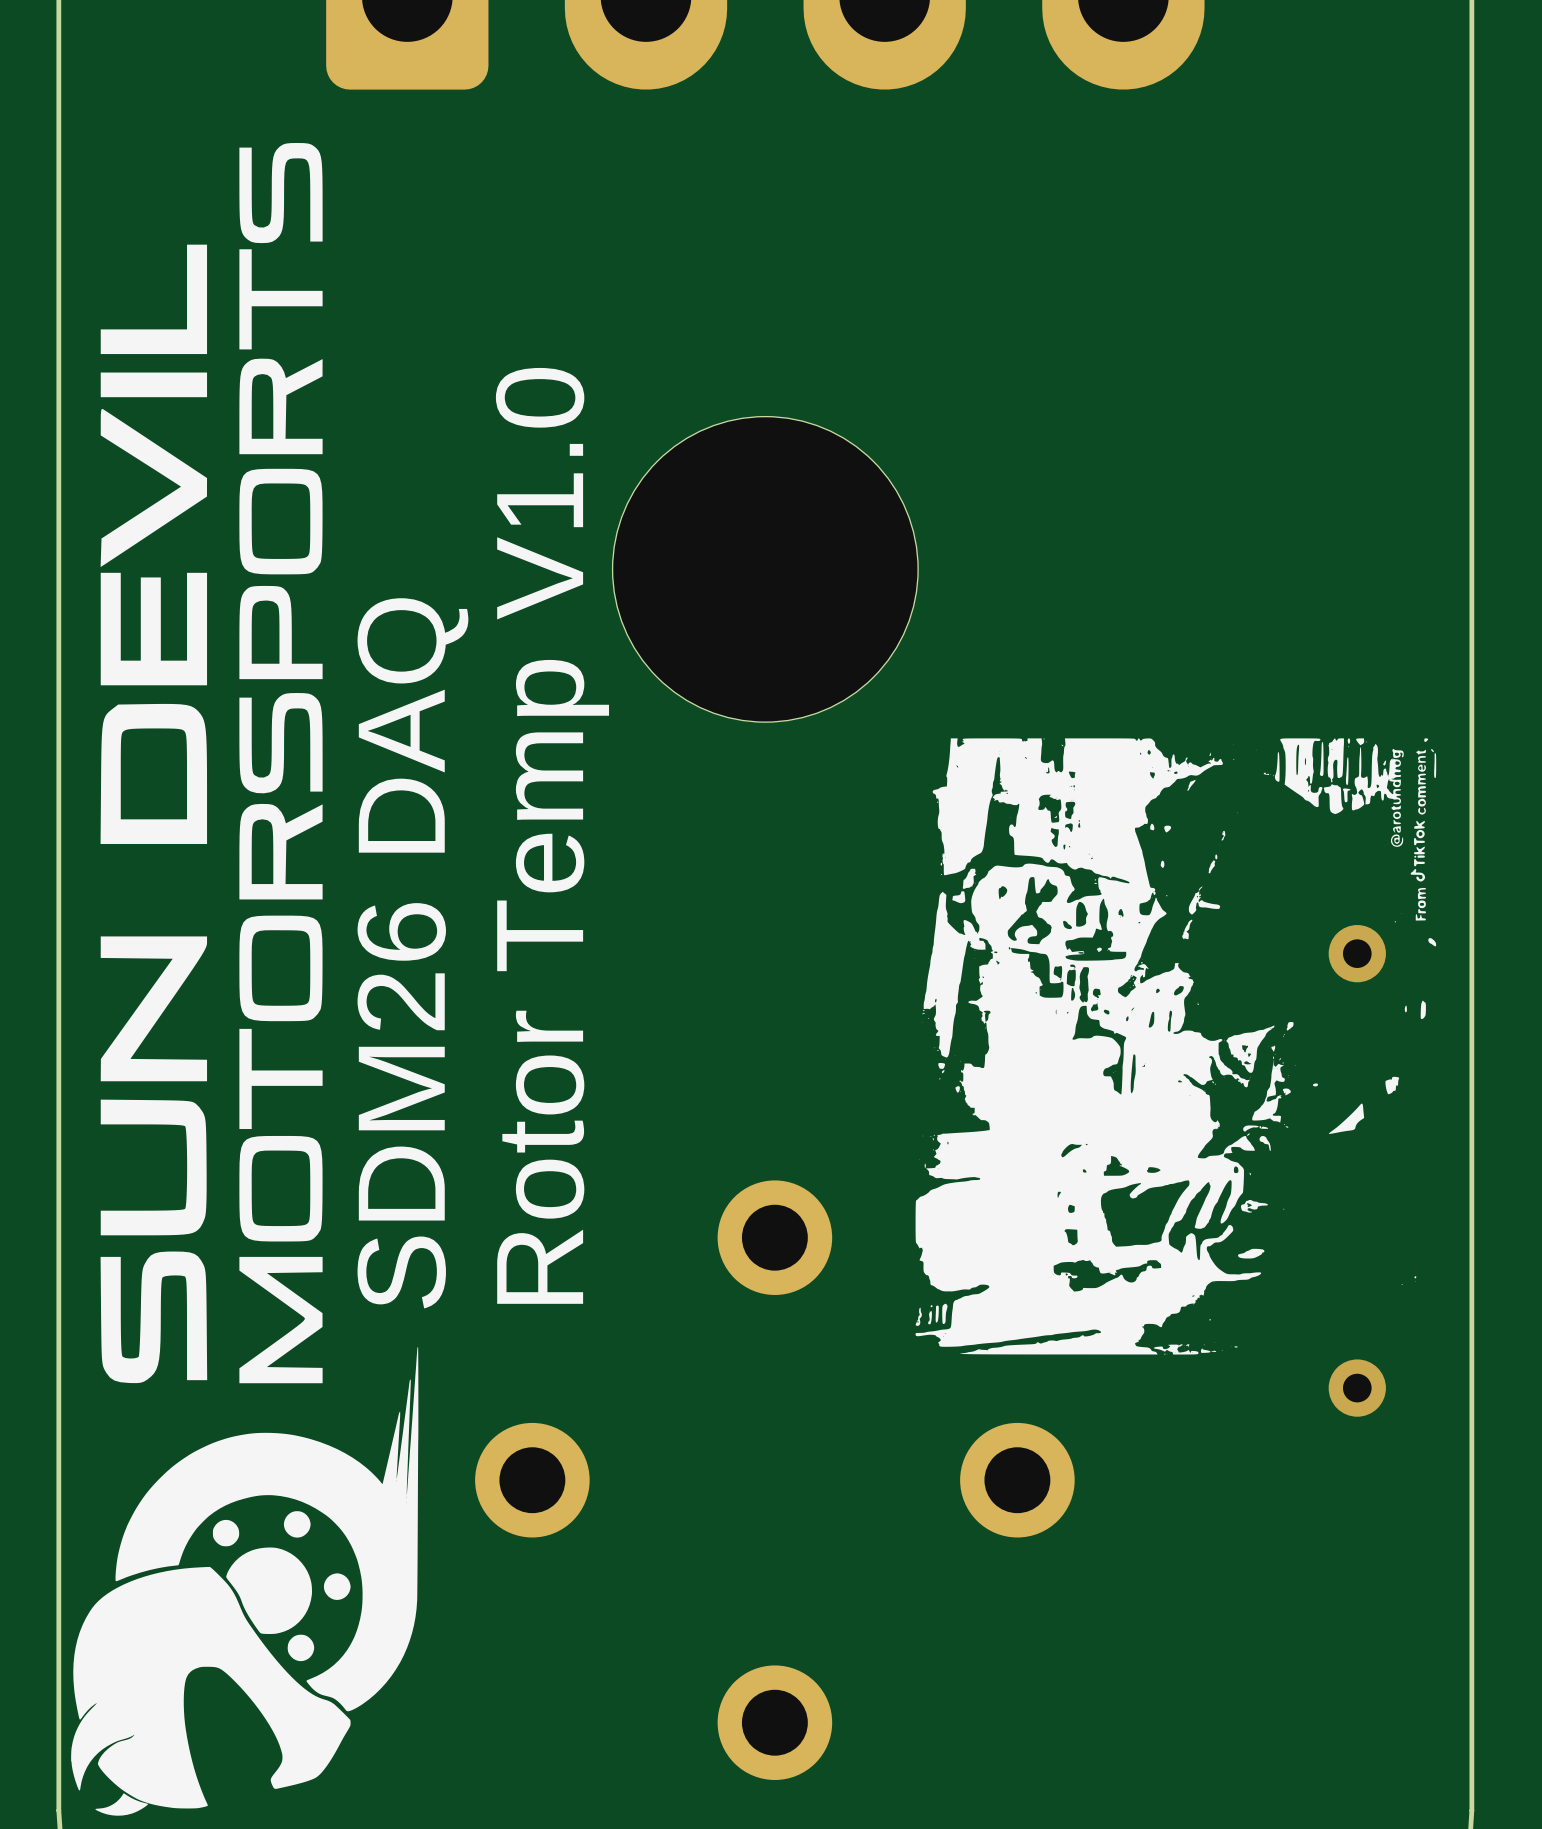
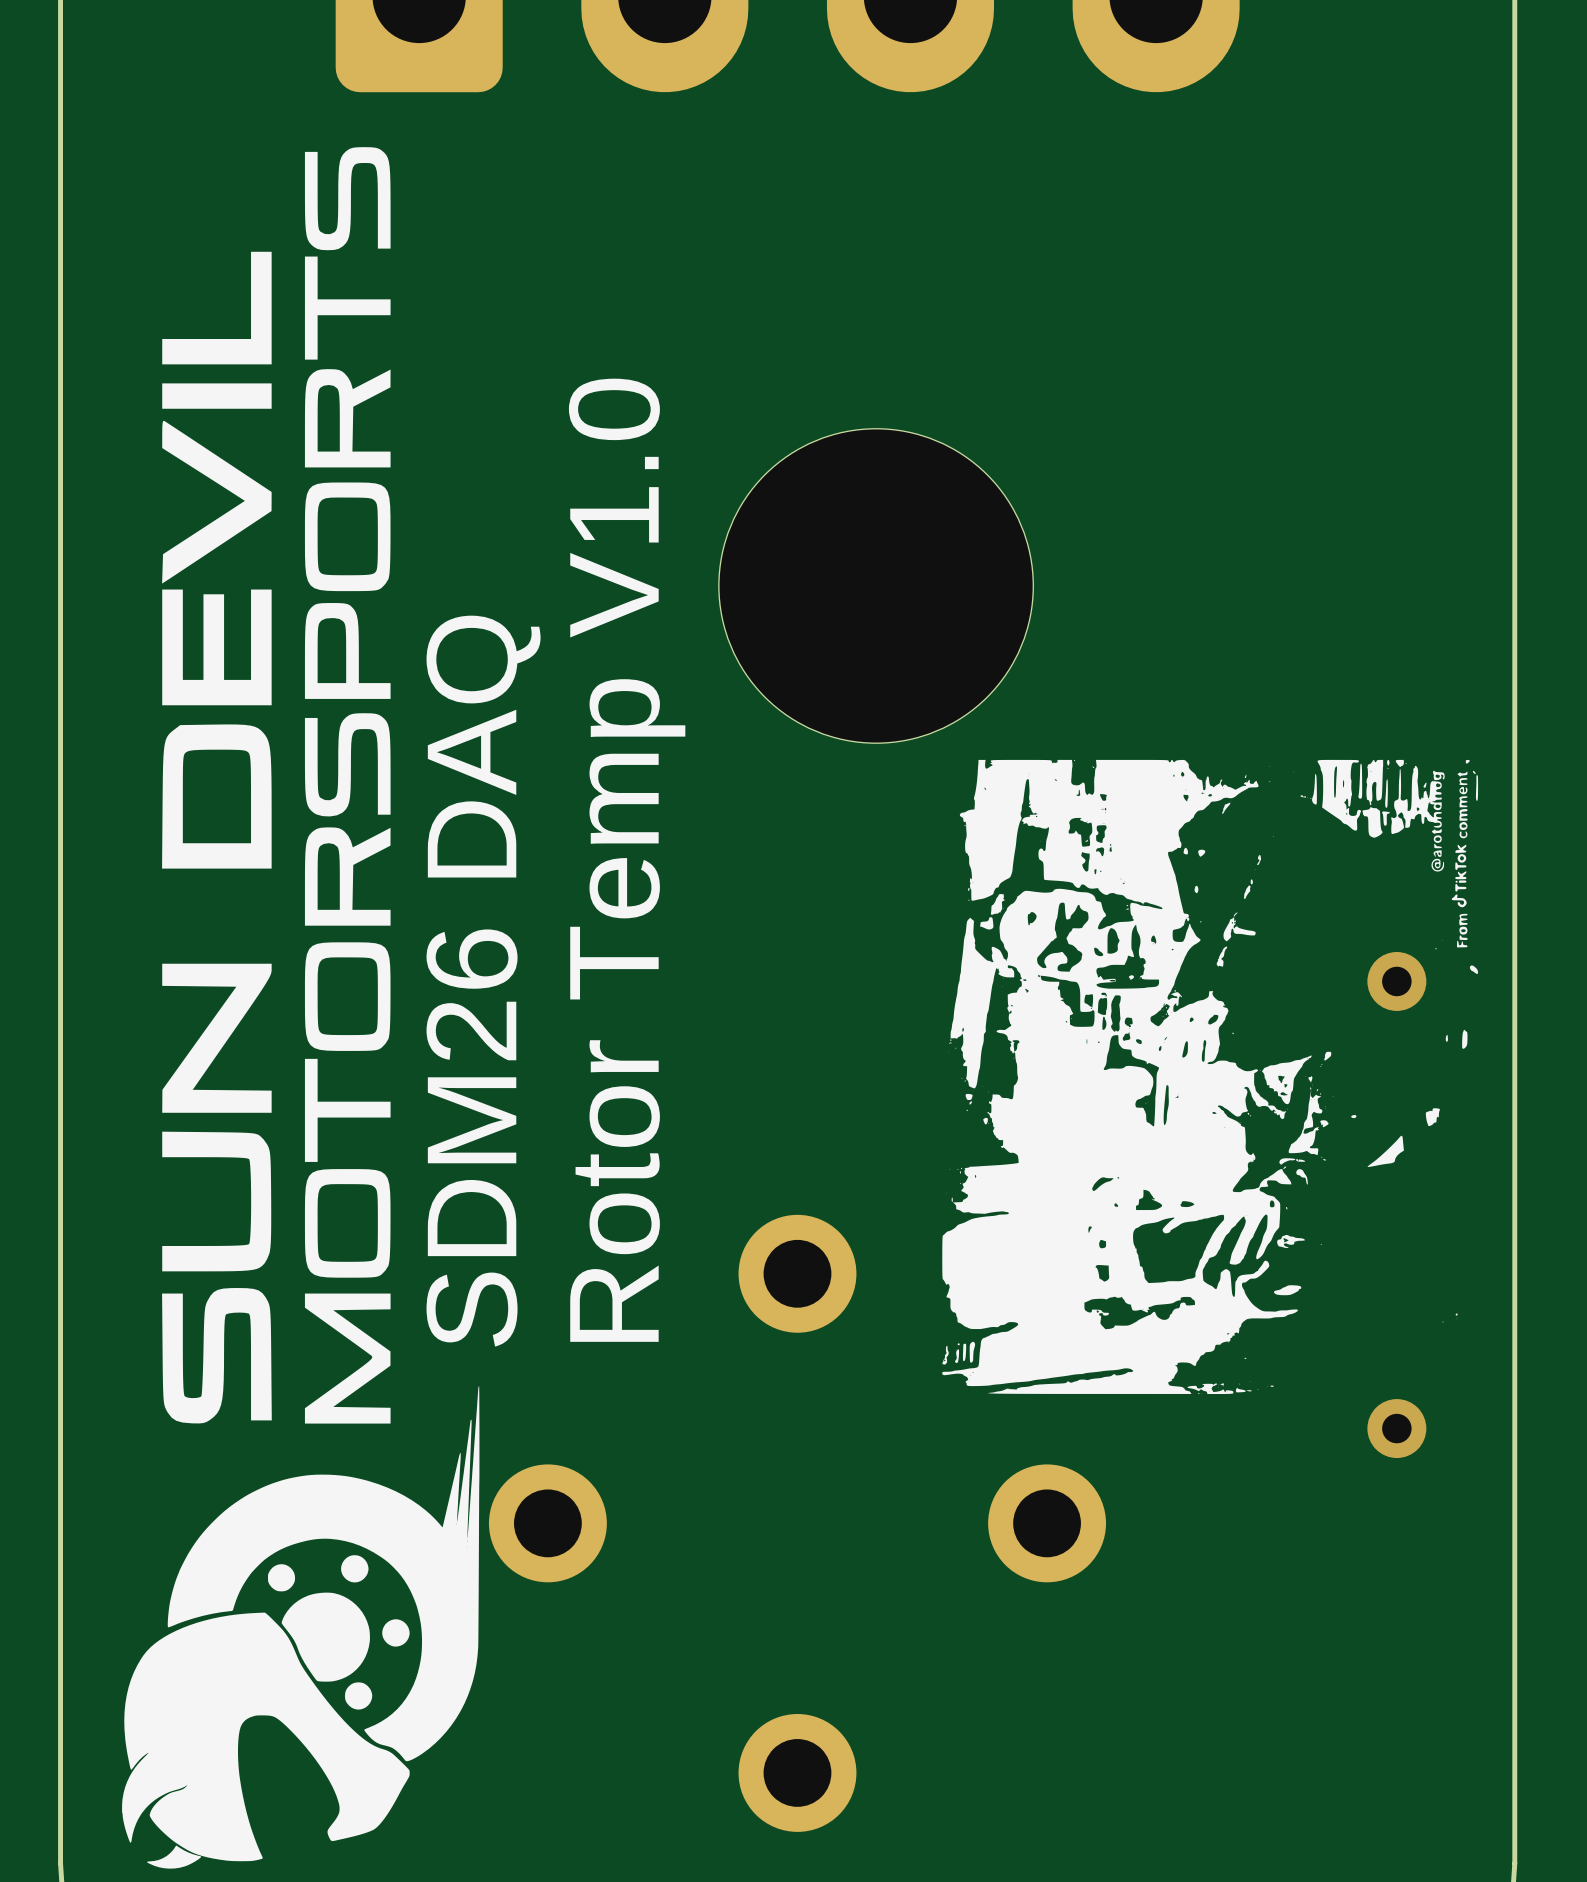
part position: (765, 569) -> (876, 585)
drawing position: (211, 763) -> (276, 785)
text position: Rotor Temp V1.0 (552, 835) -> Rotor Temp V1.0 (627, 860)
text position: SDM26 DAQ (412, 953) -> SDM26 DAQ (483, 981)
drawing position: (244, 1581) -> (300, 1627)

